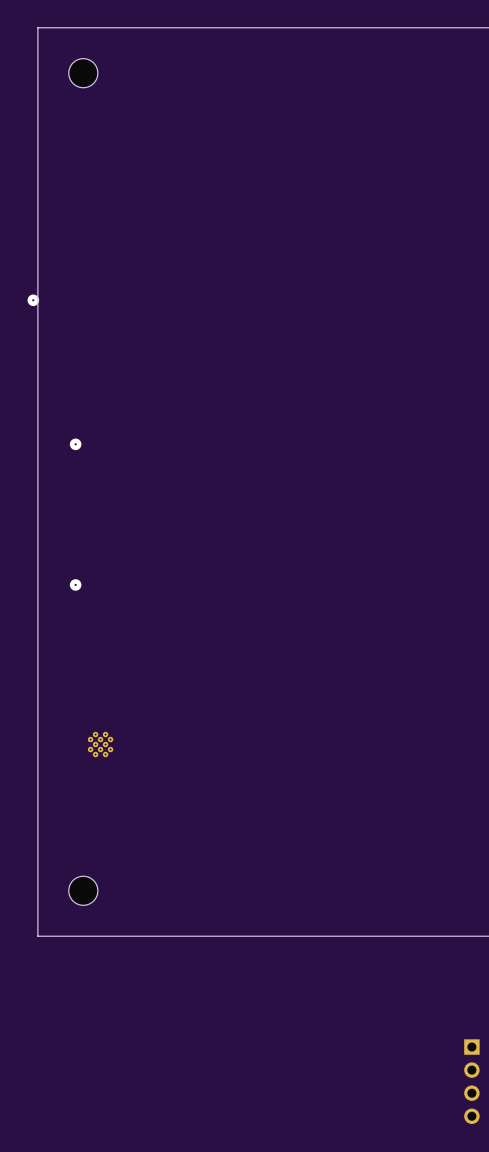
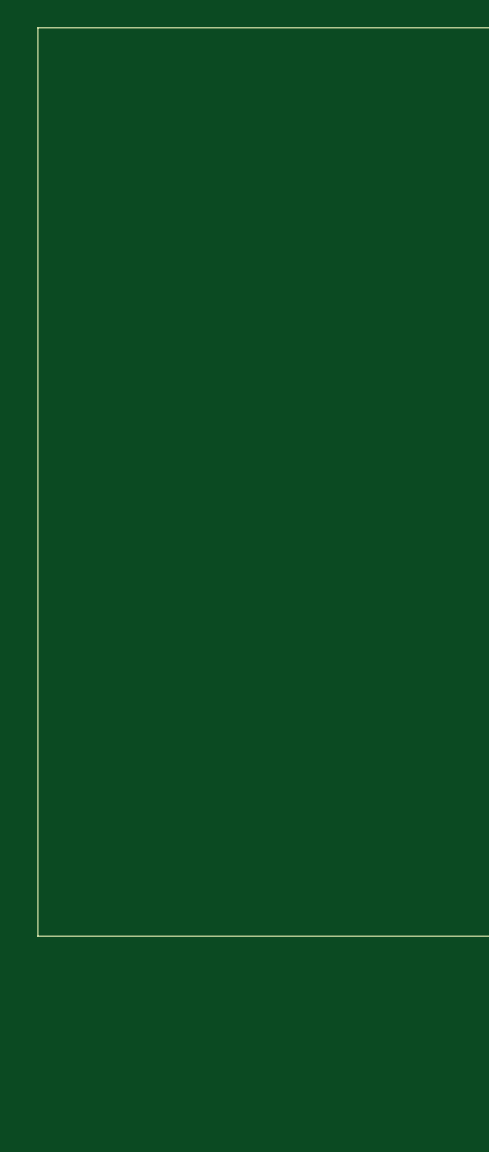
part: (83, 73) -> none
part: (33, 300) -> none
part: (75, 444) -> none
part: (75, 584) -> none
part: (100, 744) -> none
part: (83, 890) -> none
part: (471, 1081) -> none

